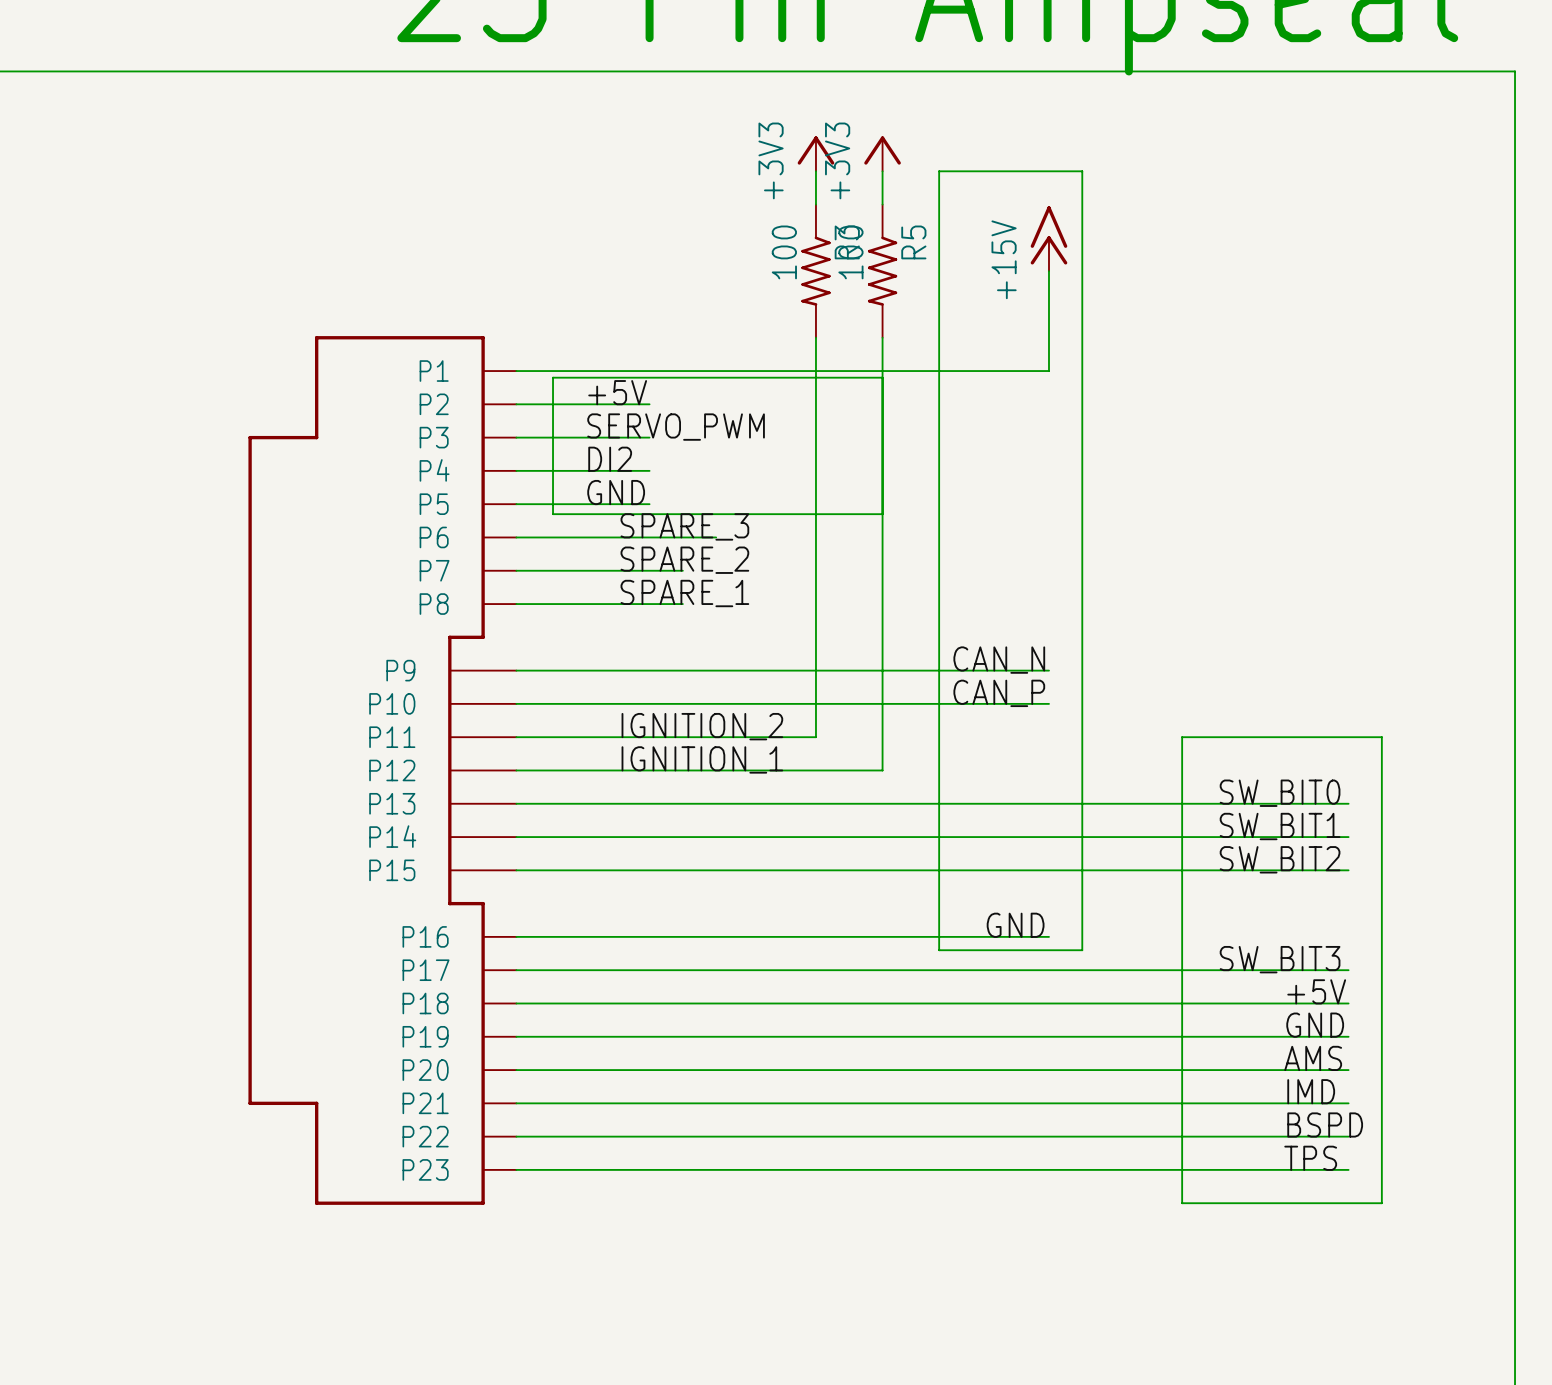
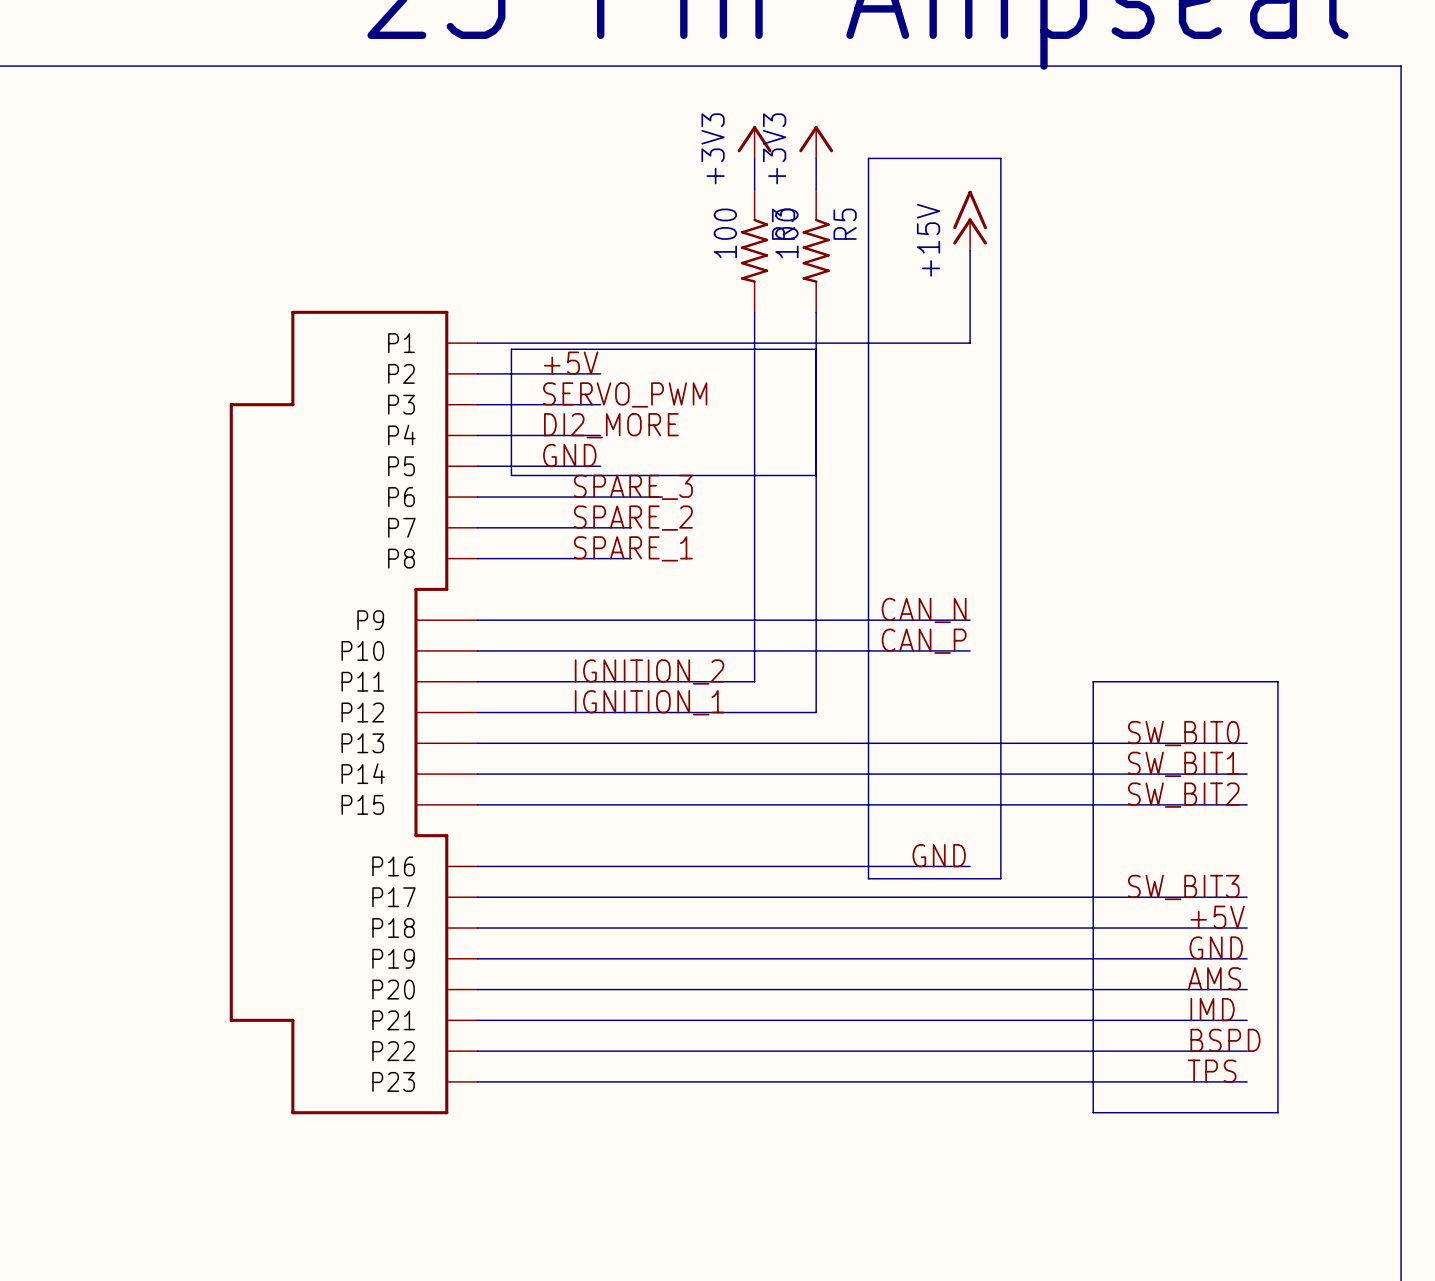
label: DI2 (610, 459) -> DI2_MORE (611, 425)

